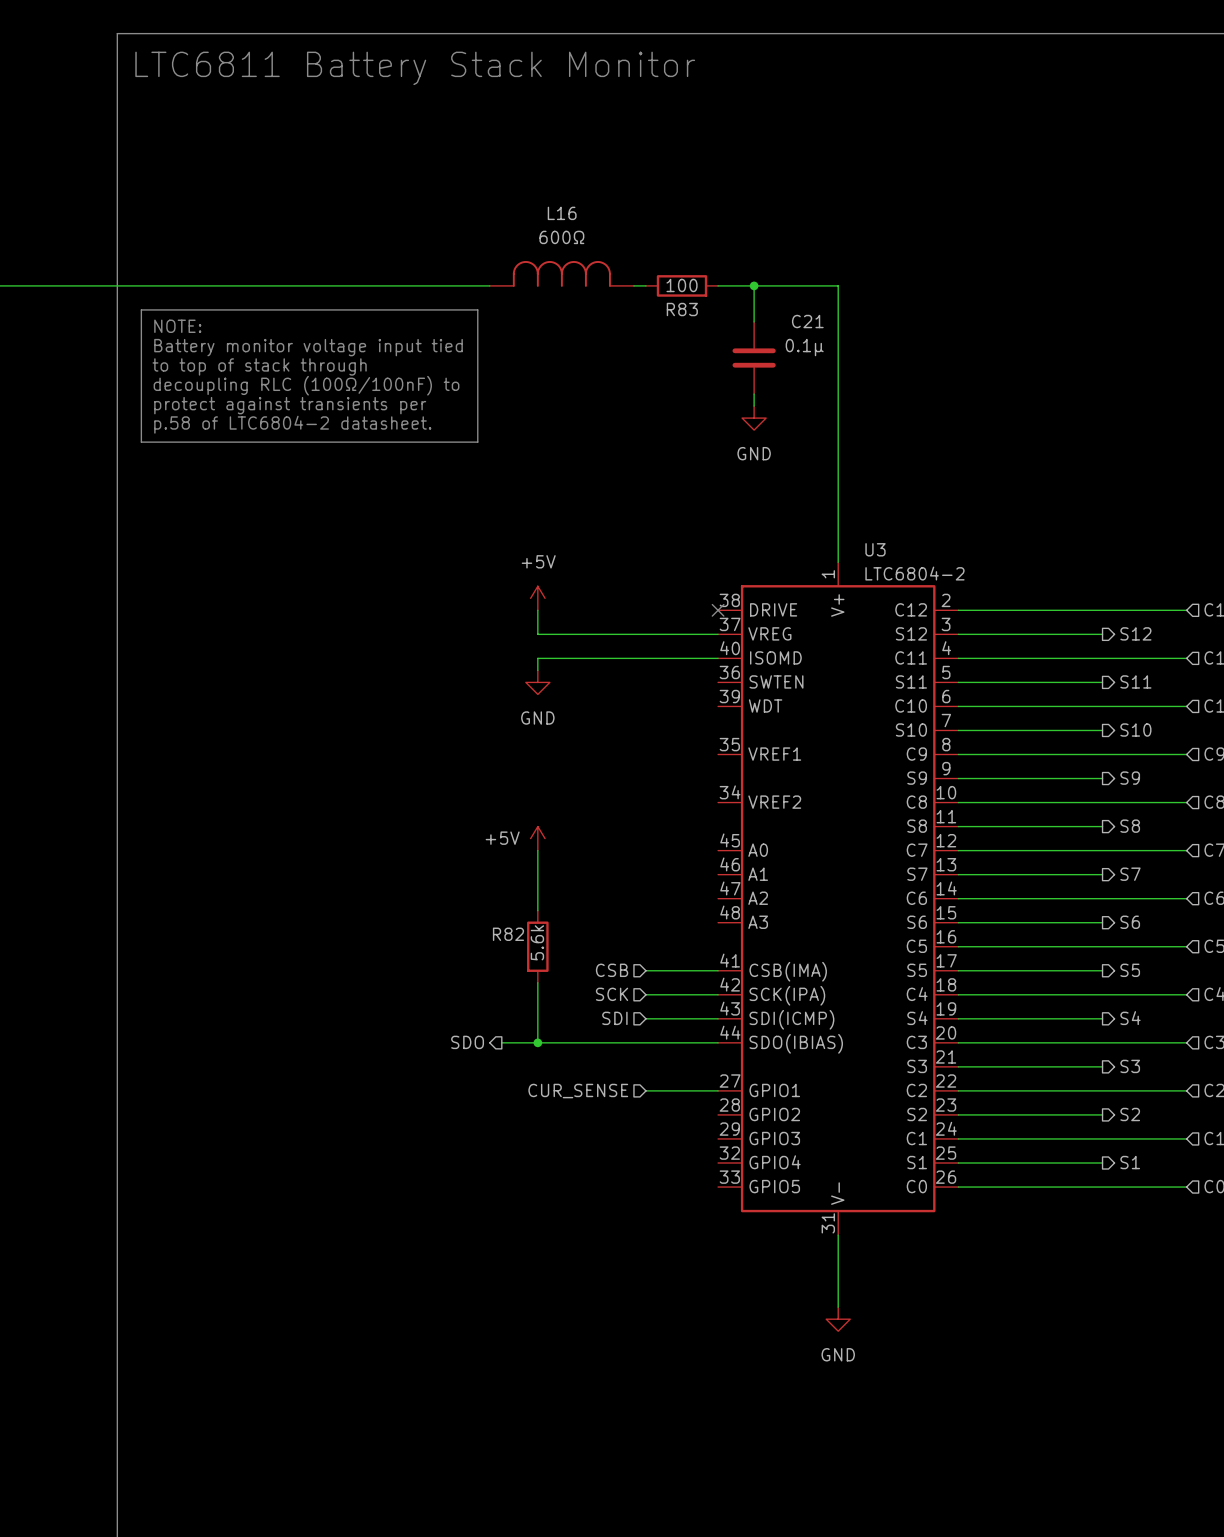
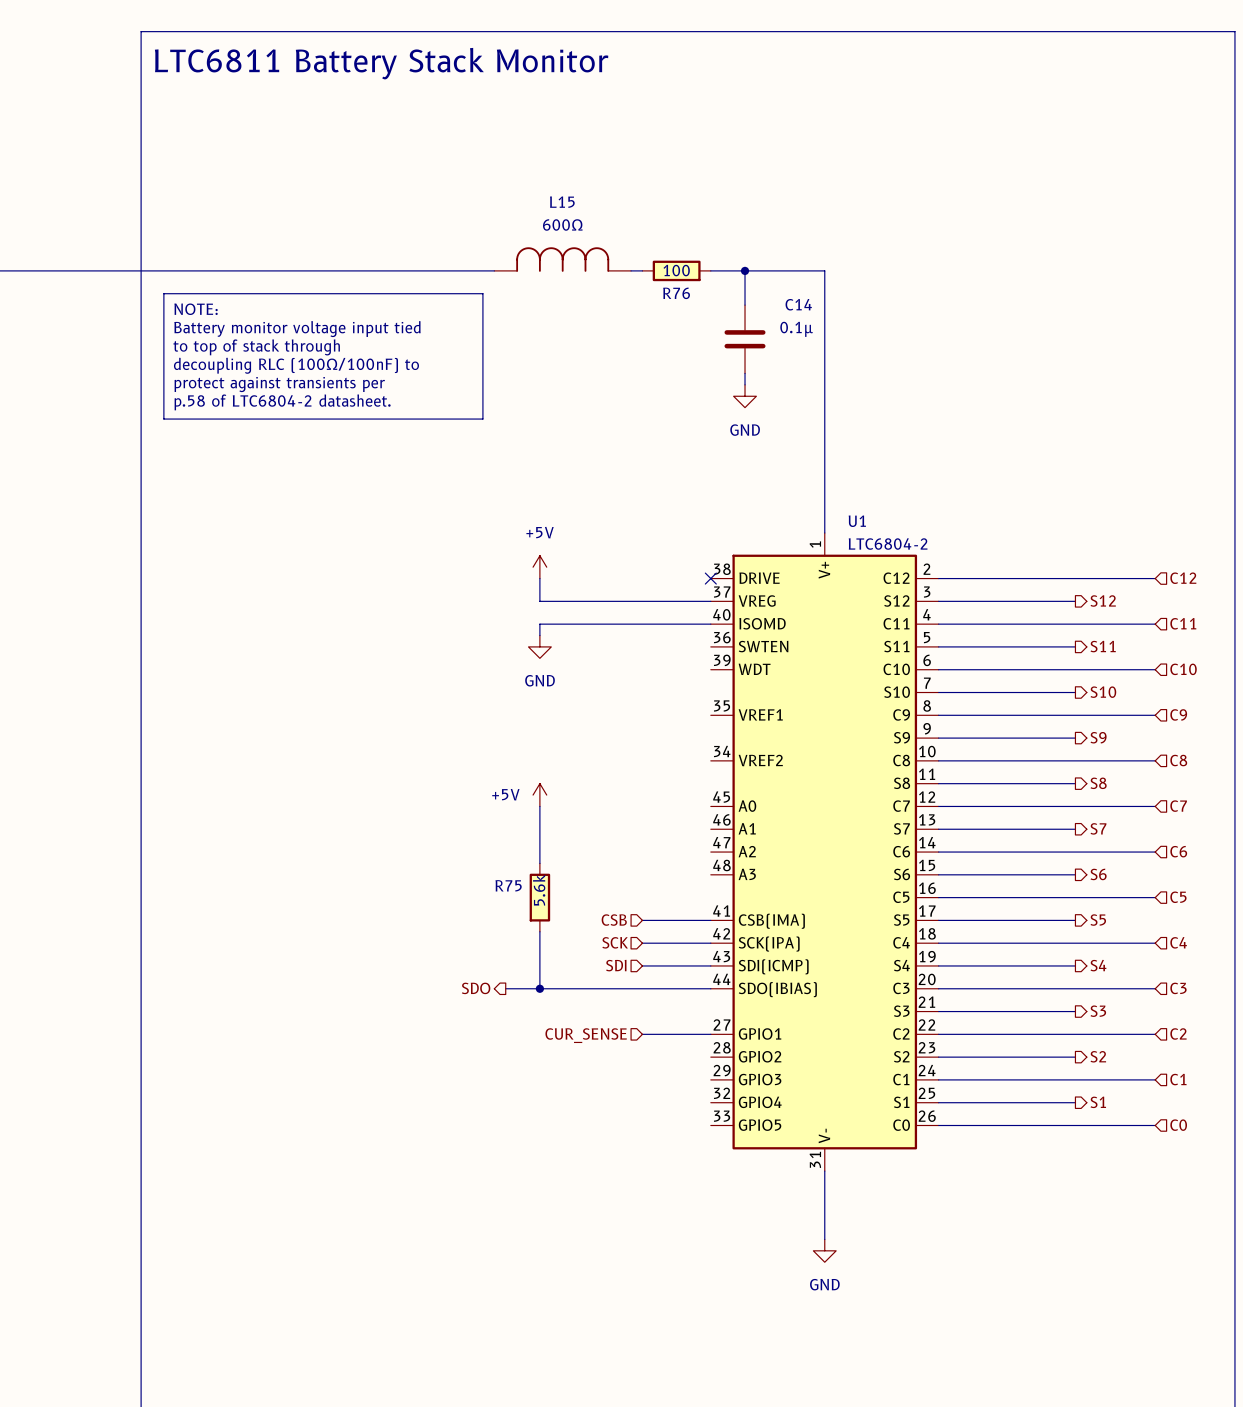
L16 name: L16 (562, 213) -> L15 (562, 202)
R83 name: R83 (682, 309) -> R76 (676, 293)
C21 name: C21 (807, 321) -> C14 (798, 304)
U3 name: U3 (875, 549) -> U1 (857, 521)
R82 name: R82 (508, 934) -> R75 (508, 885)

